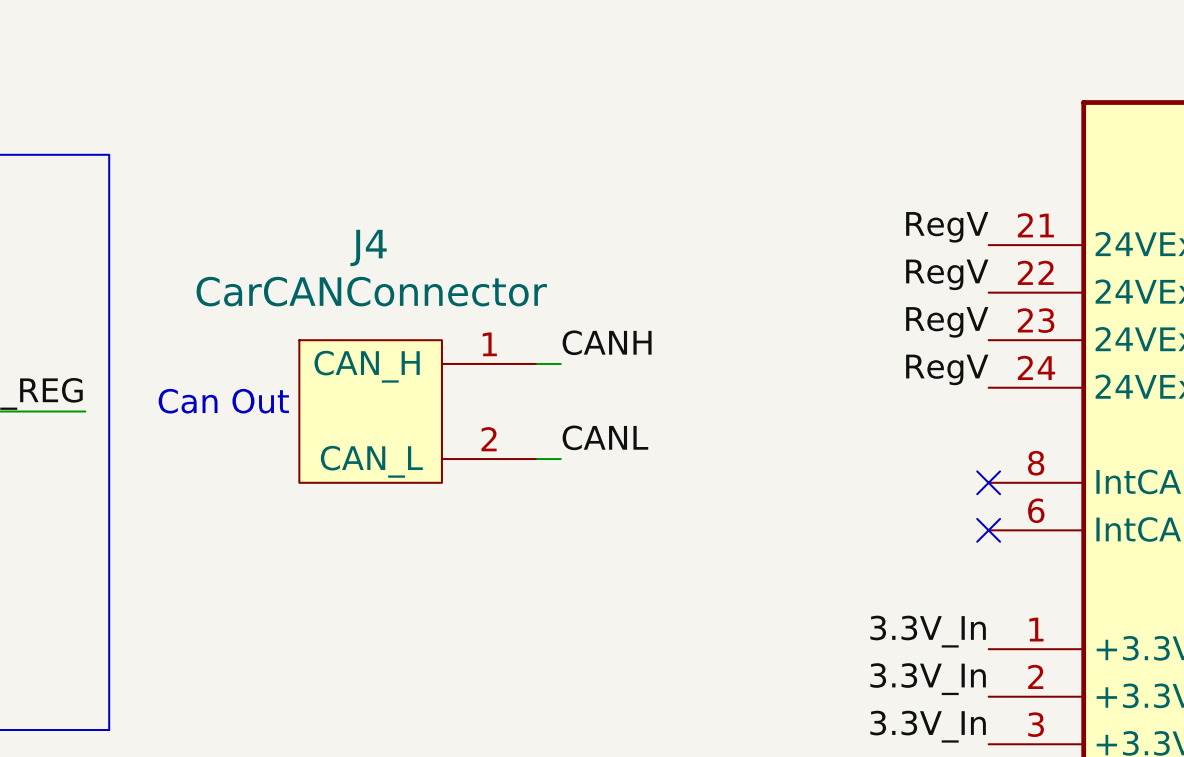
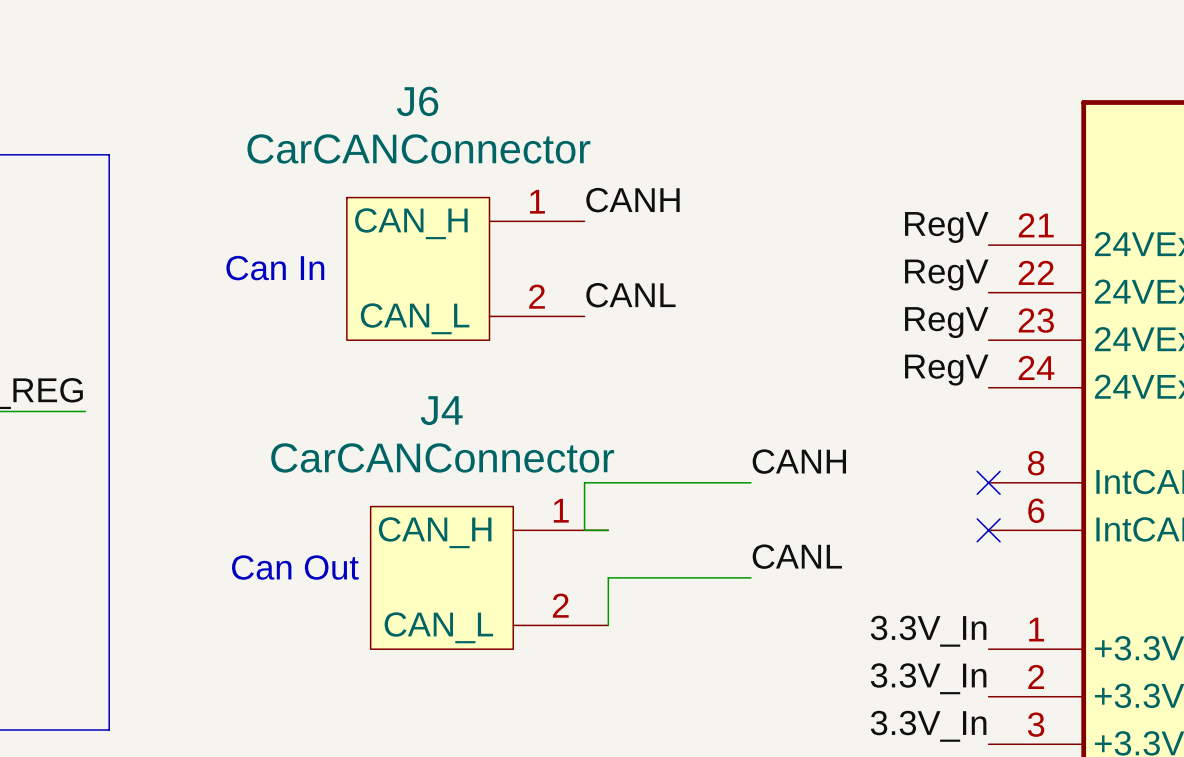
label: none -> CANH (632, 200)
text: none -> Can In (275, 268)
J6: none -> CarCANConnector (465, 268)
label: CANH (607, 342) -> CANL (630, 295)
wire: (537, 363) (560, 363) -> none
text position: Can Out (223, 401) -> Can Out (295, 567)
J4 position: (418, 411) -> (489, 577)
label: CANL (605, 437) -> none
wire: (537, 459) (560, 459) -> none
label: none -> CANH (799, 461)
wire: none -> (750, 482) (584, 482) (584, 530) (608, 530)
label: none -> CANL (797, 556)
wire: none -> (750, 577) (608, 577) (608, 625)

